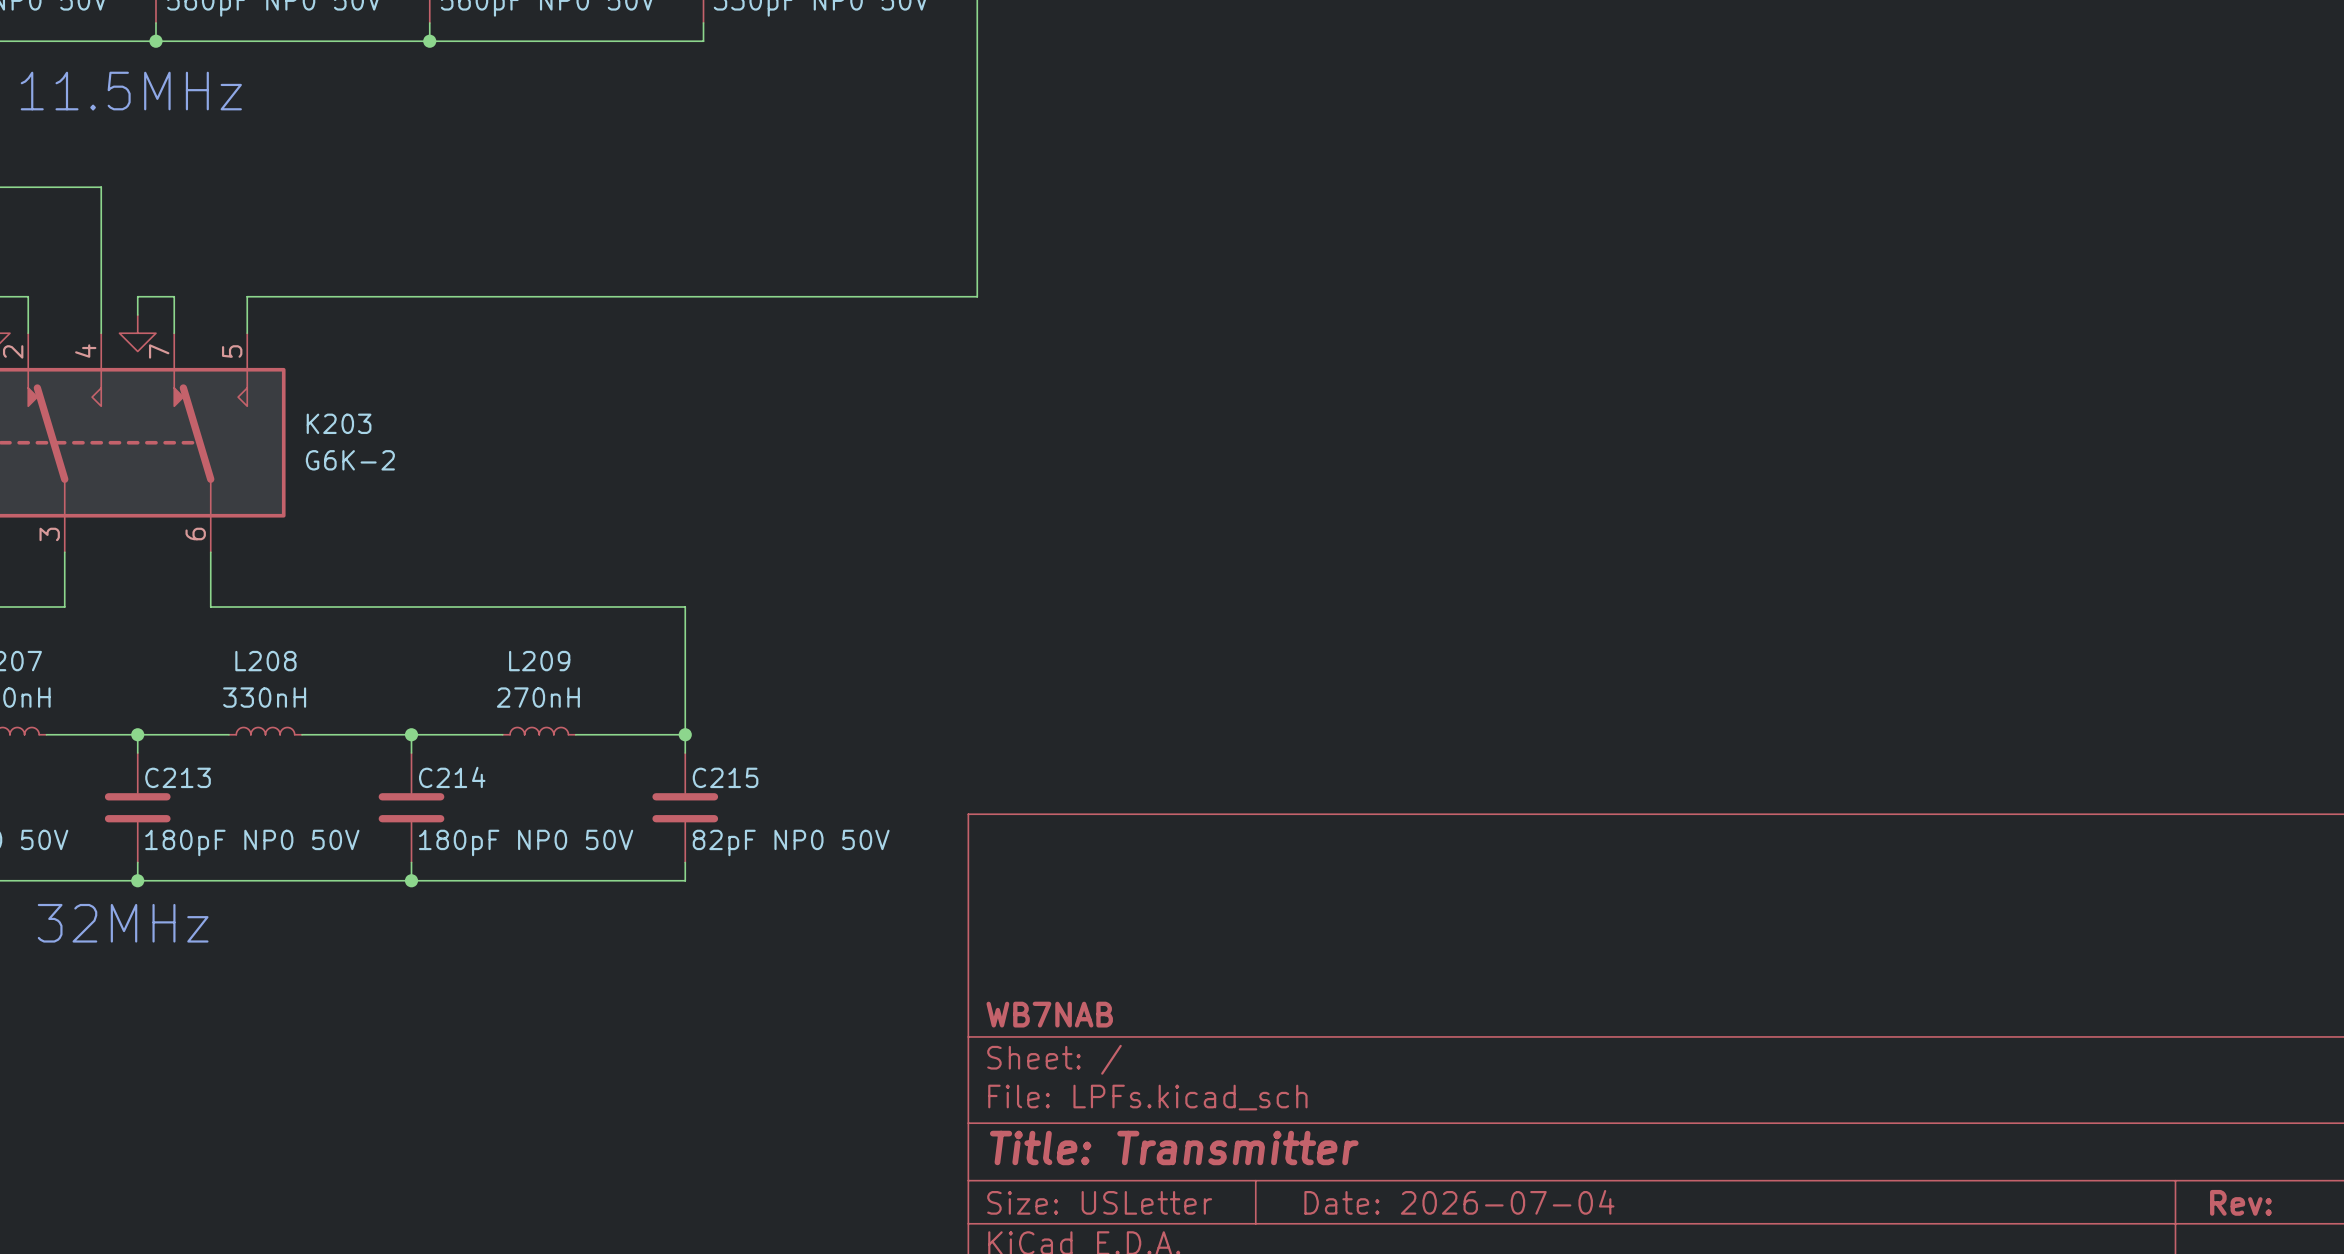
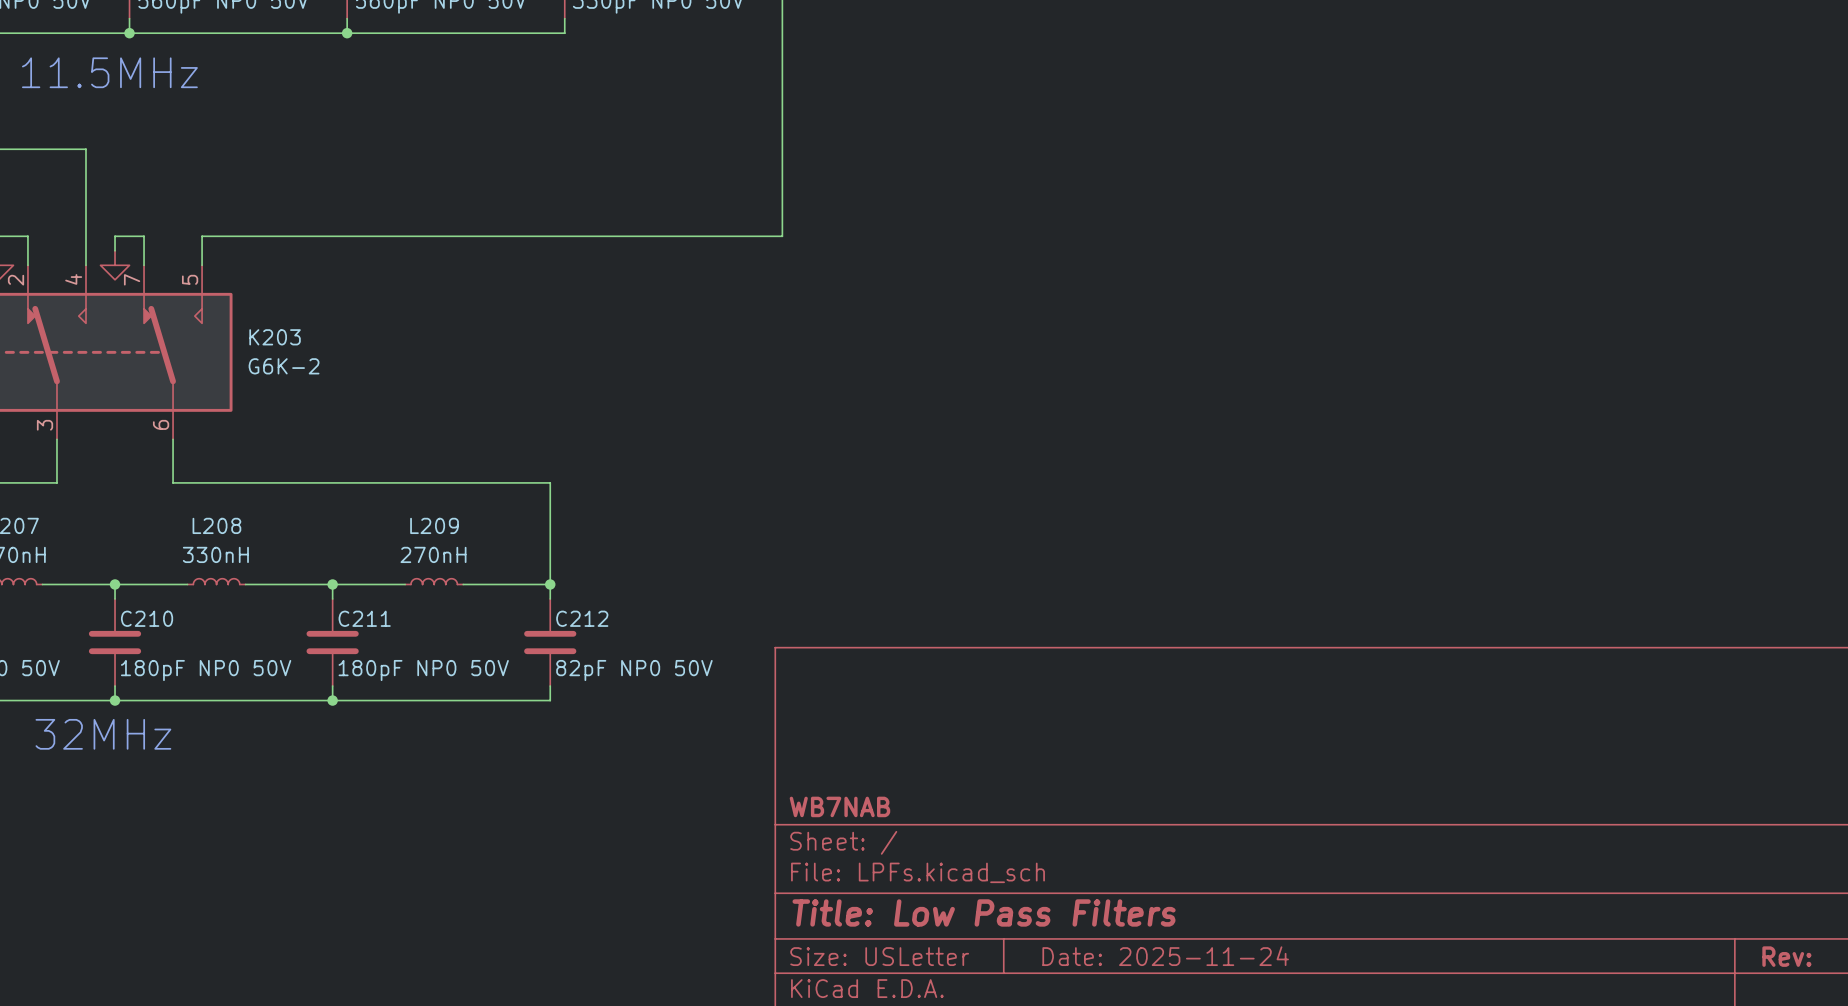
C213 name: C213 (178, 777) -> C210 (147, 618)
C214 name: C214 (452, 777) -> C211 (364, 618)
C215 name: C215 (725, 777) -> C212 (582, 618)
title block: Title: Transmitter (1174, 1147) -> Title: Low Pass Filters (984, 912)
title block: Date: 2026-07-04 (1459, 1202) -> Date: 2025-11-24 (1165, 956)

